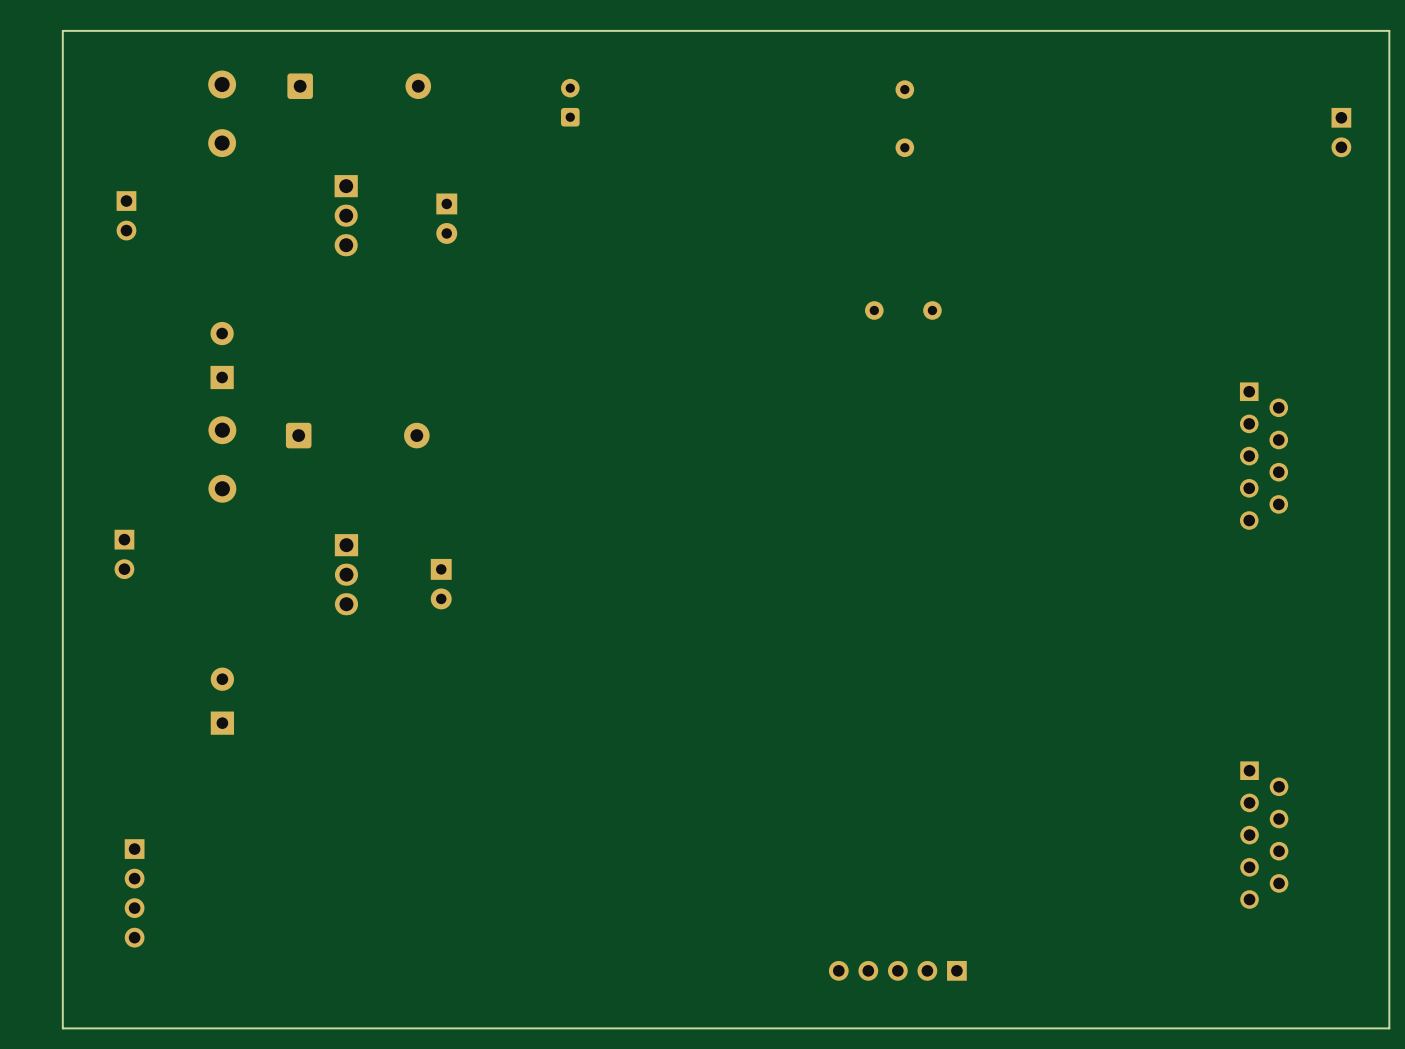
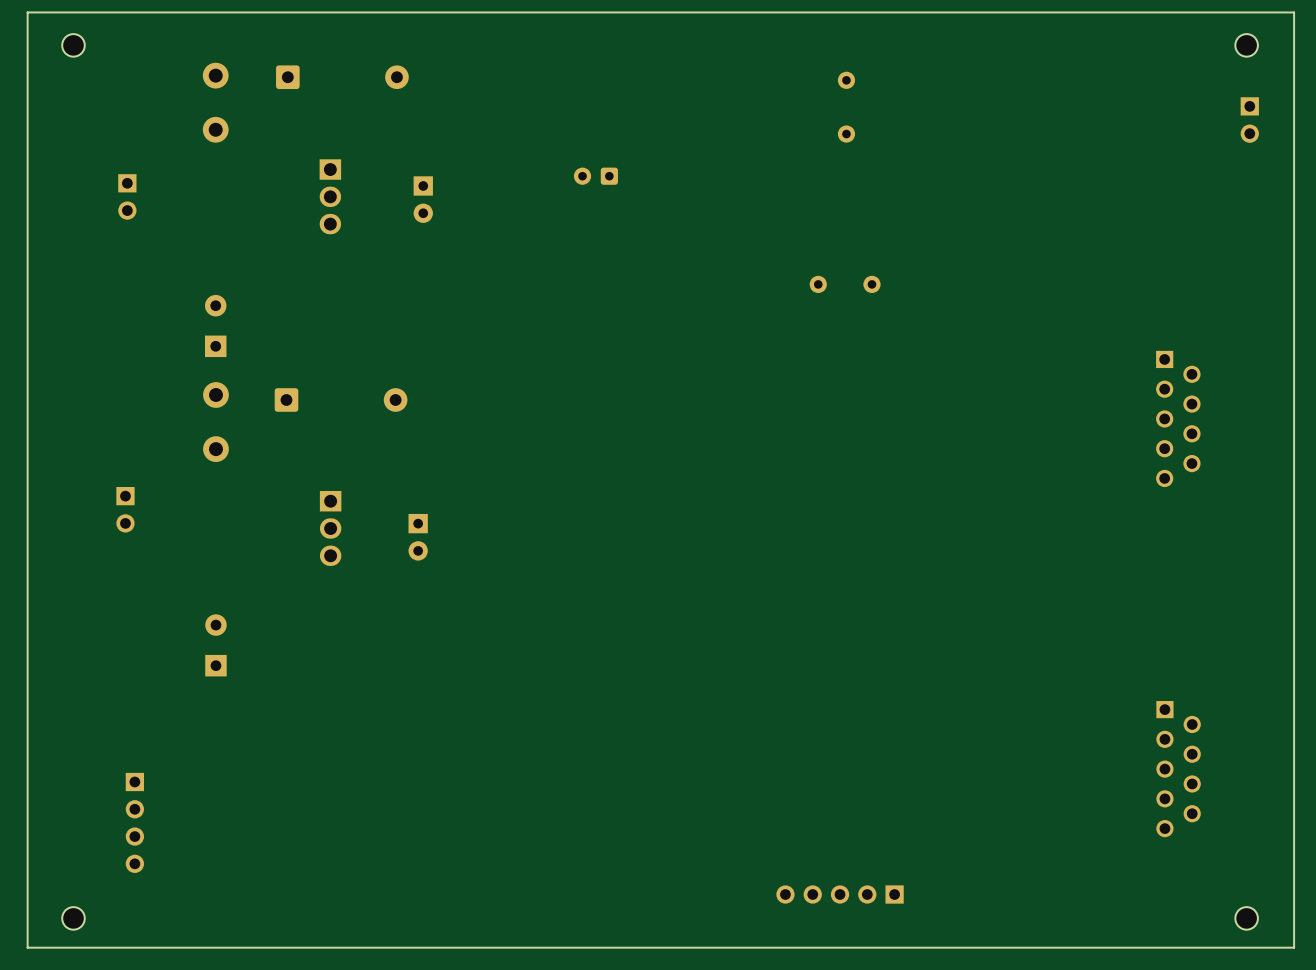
board edge: (1389, 30) (62, 30) (62, 1028) -> (1294, 26) (1294, 12) (27, 12) (27, 947) (68, 947)
part: none -> (73, 45)
part: none -> (1246, 45)
part rotation: 0° (570, 102) -> 90° counterclockwise (595, 176)
part position: (570, 102) -> (595, 176)
part: none -> (73, 918)
part: none -> (1246, 918)

